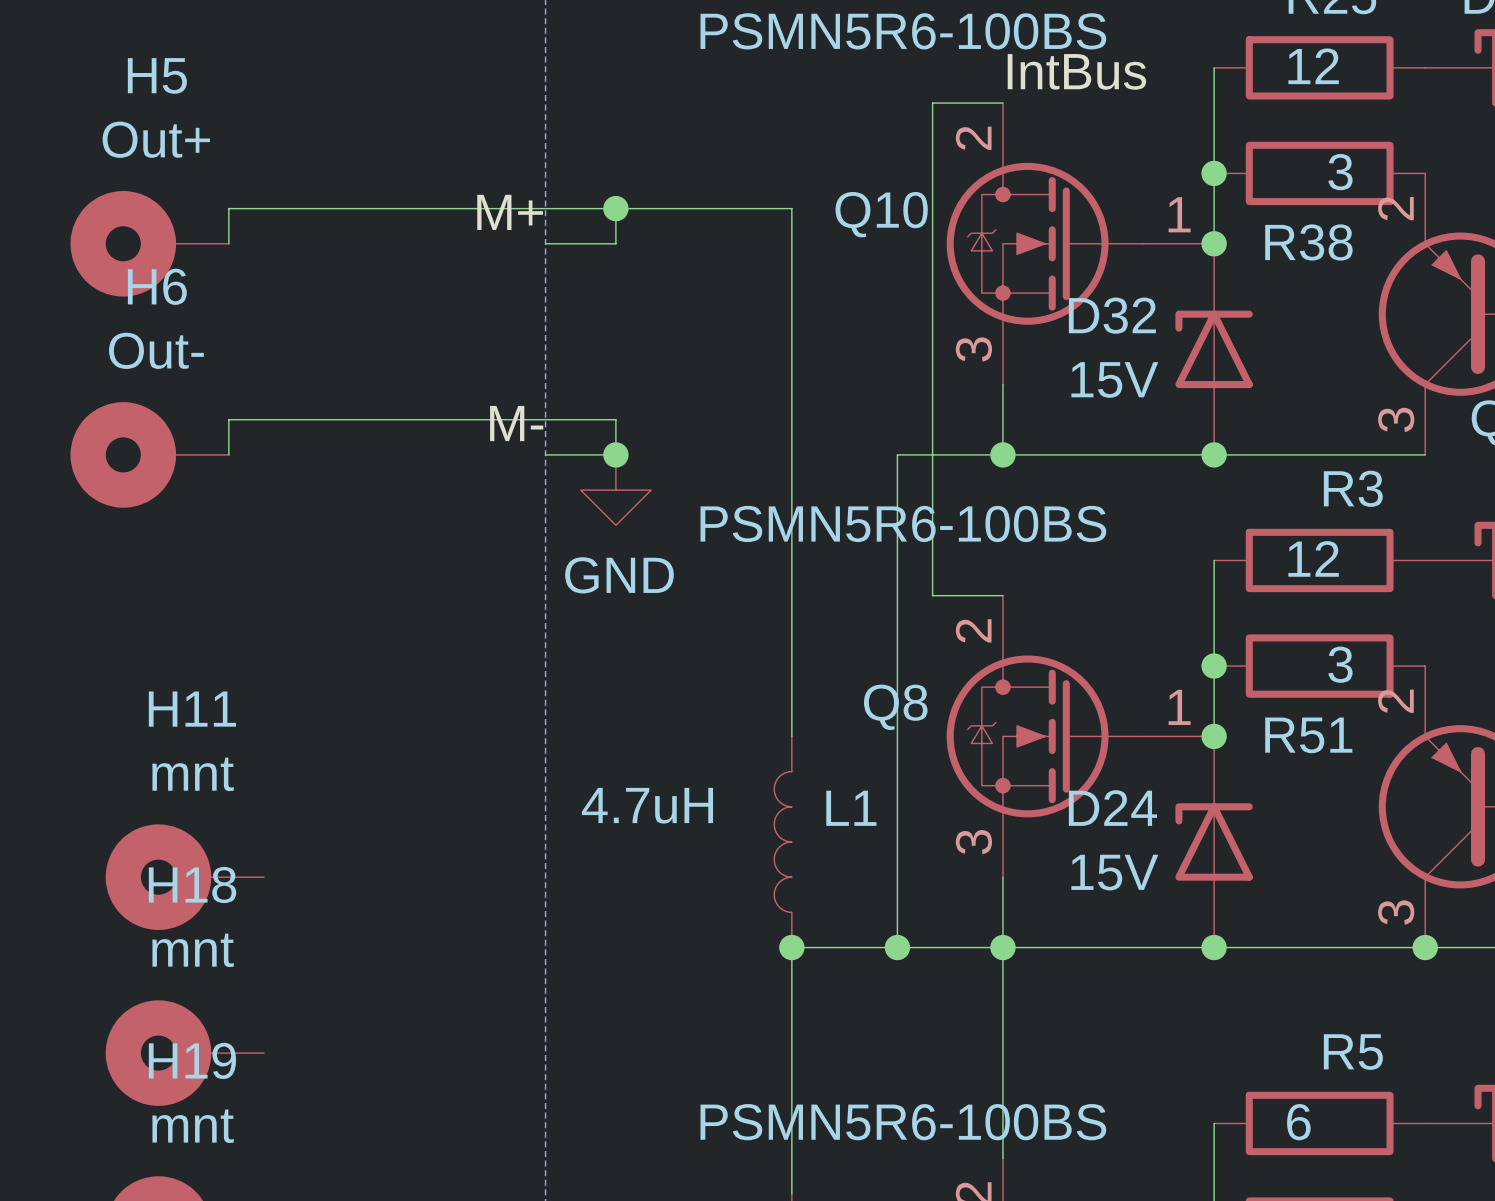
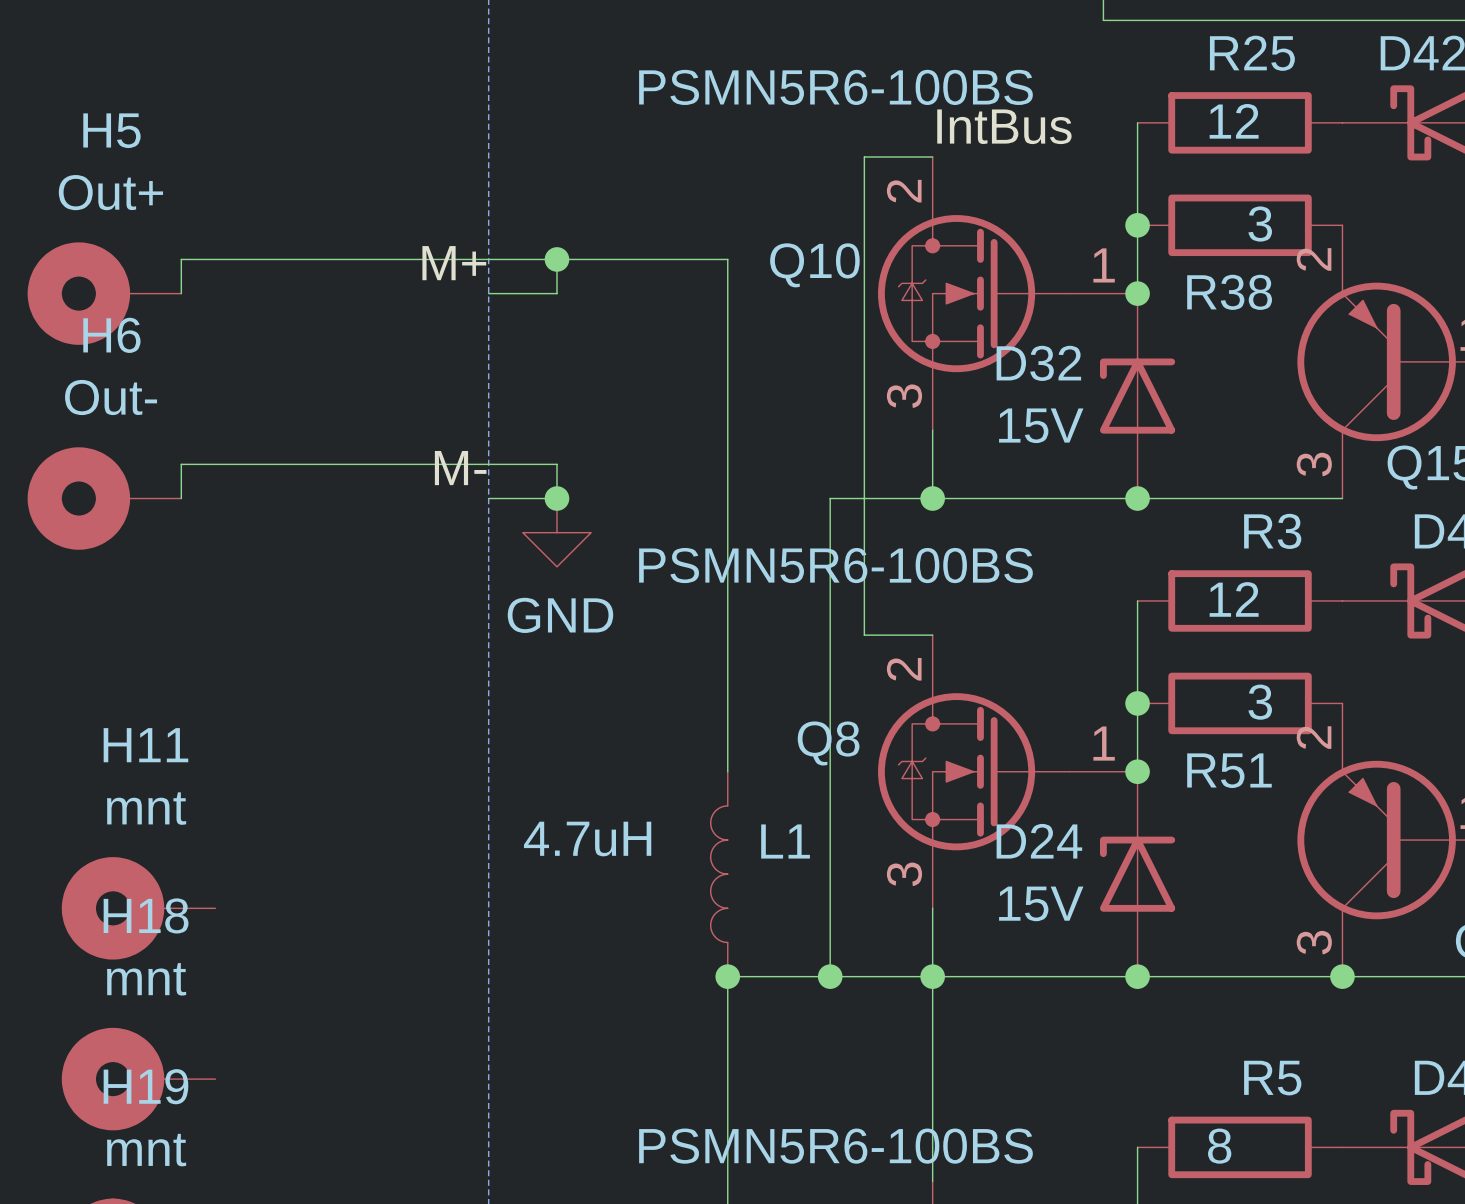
R5 value: 6 (1298, 1122) -> 8 (1219, 1146)

